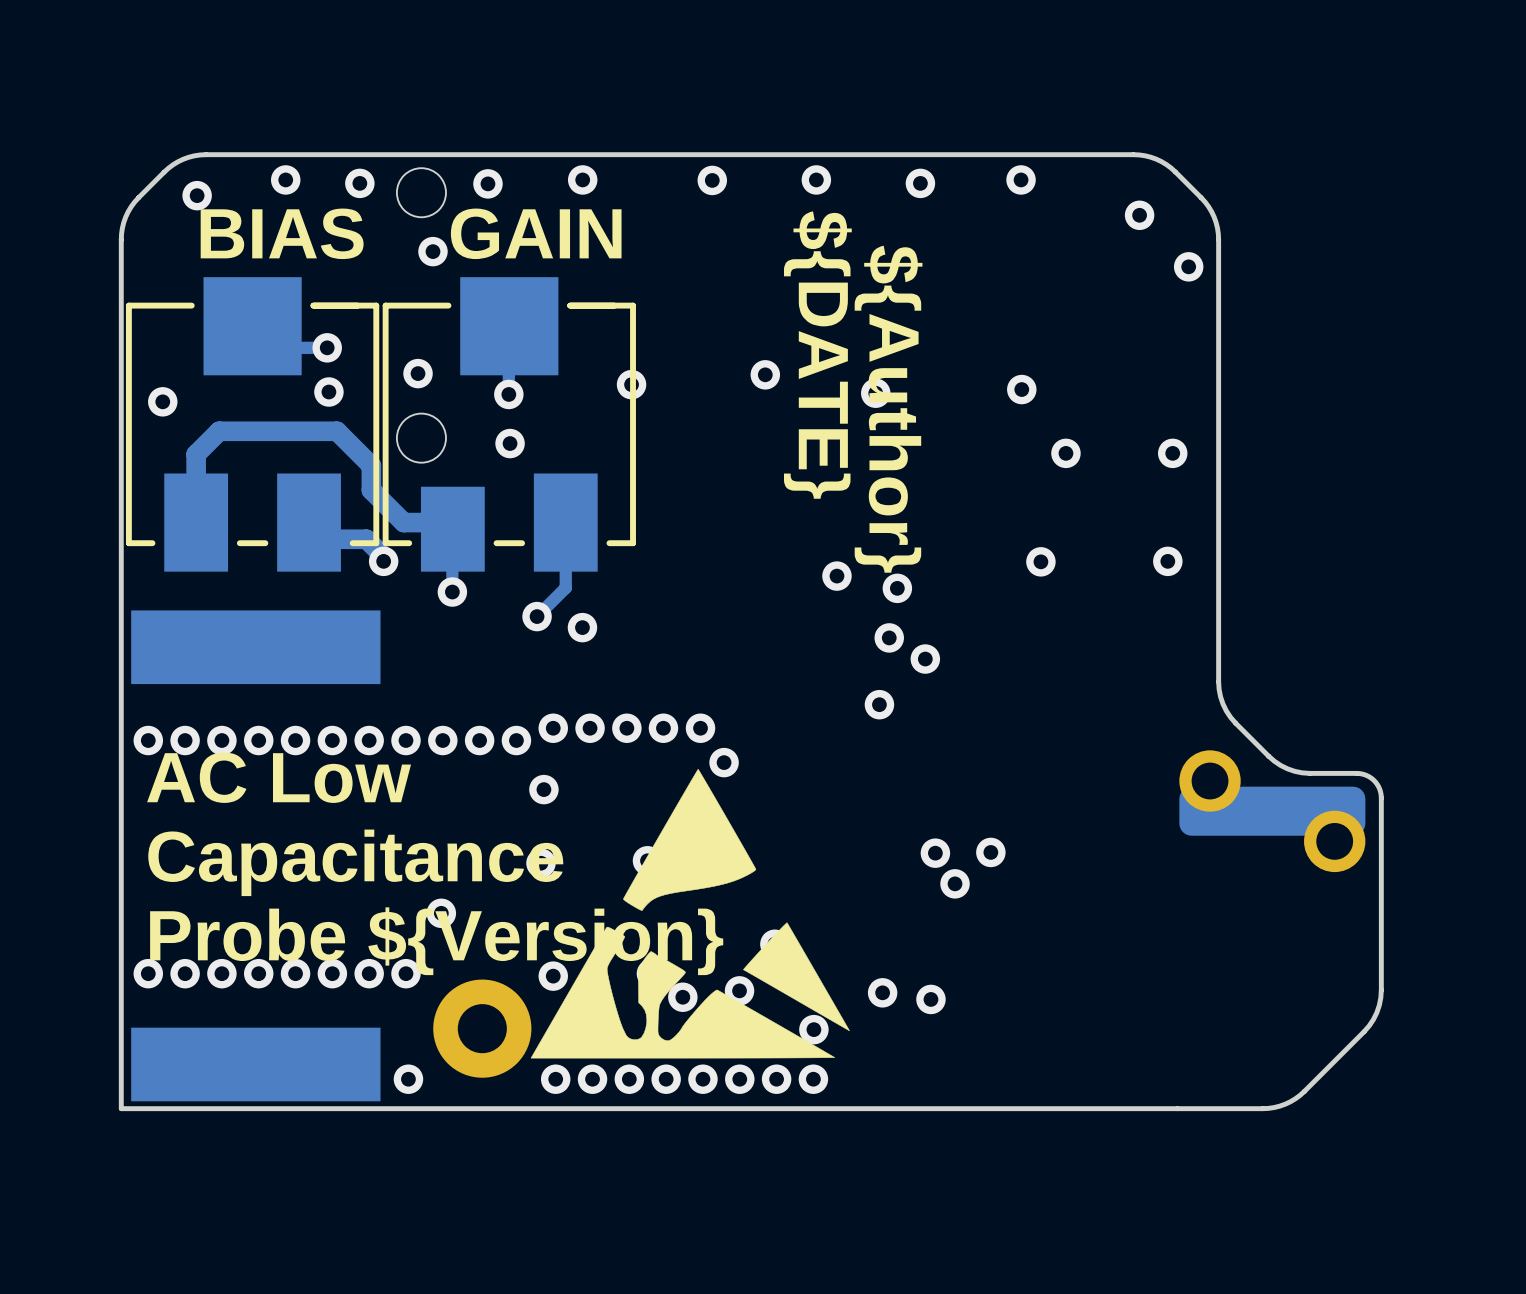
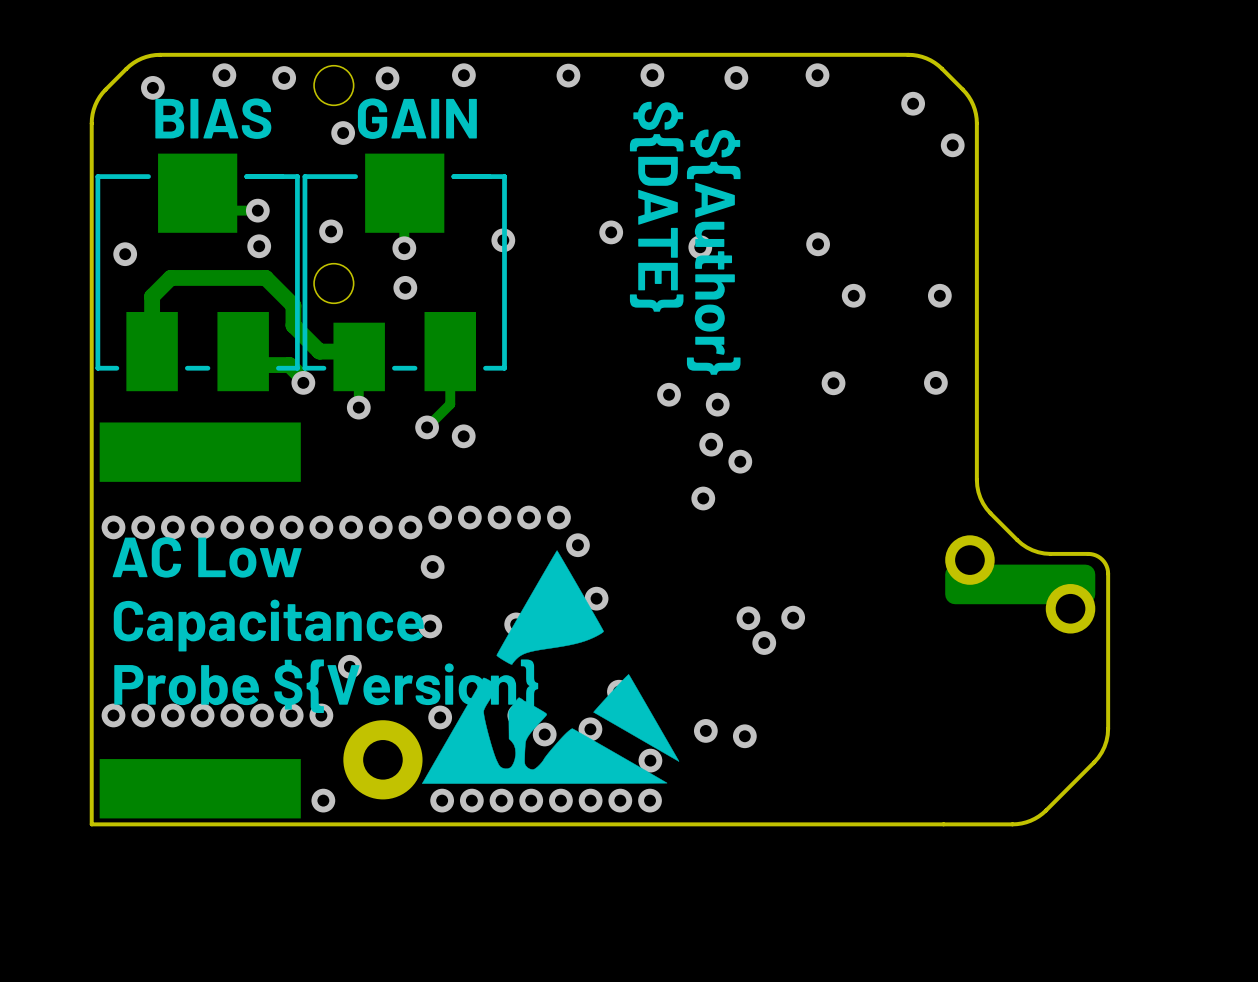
via: none -> (596, 598)

